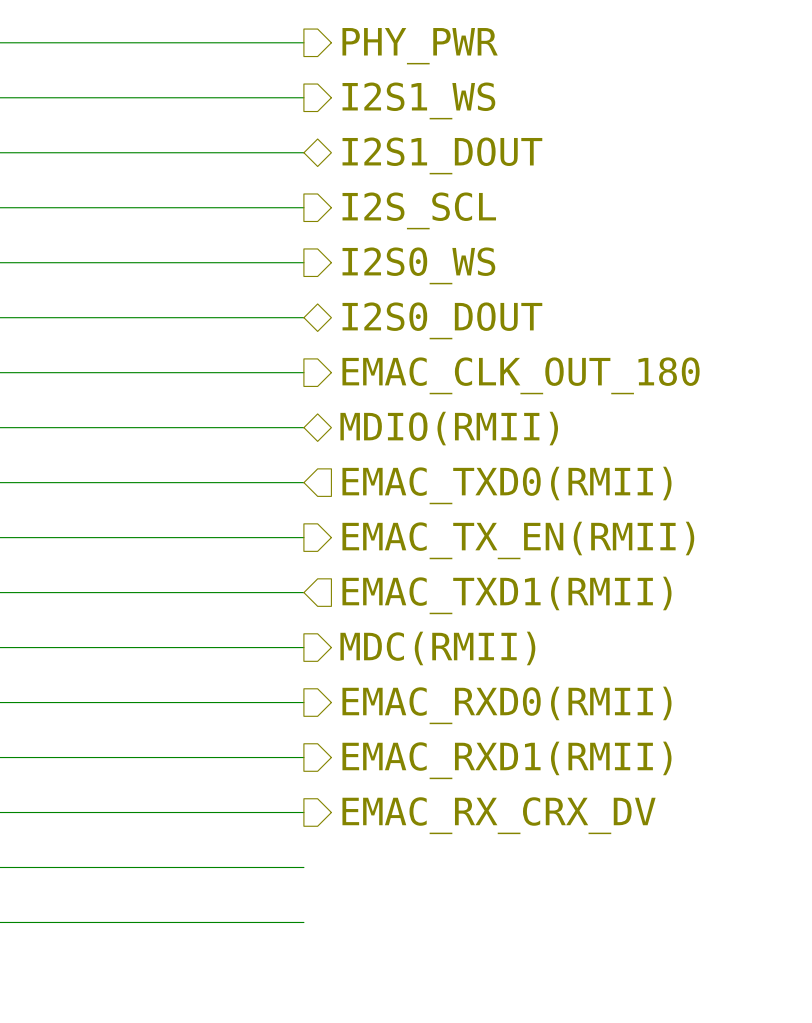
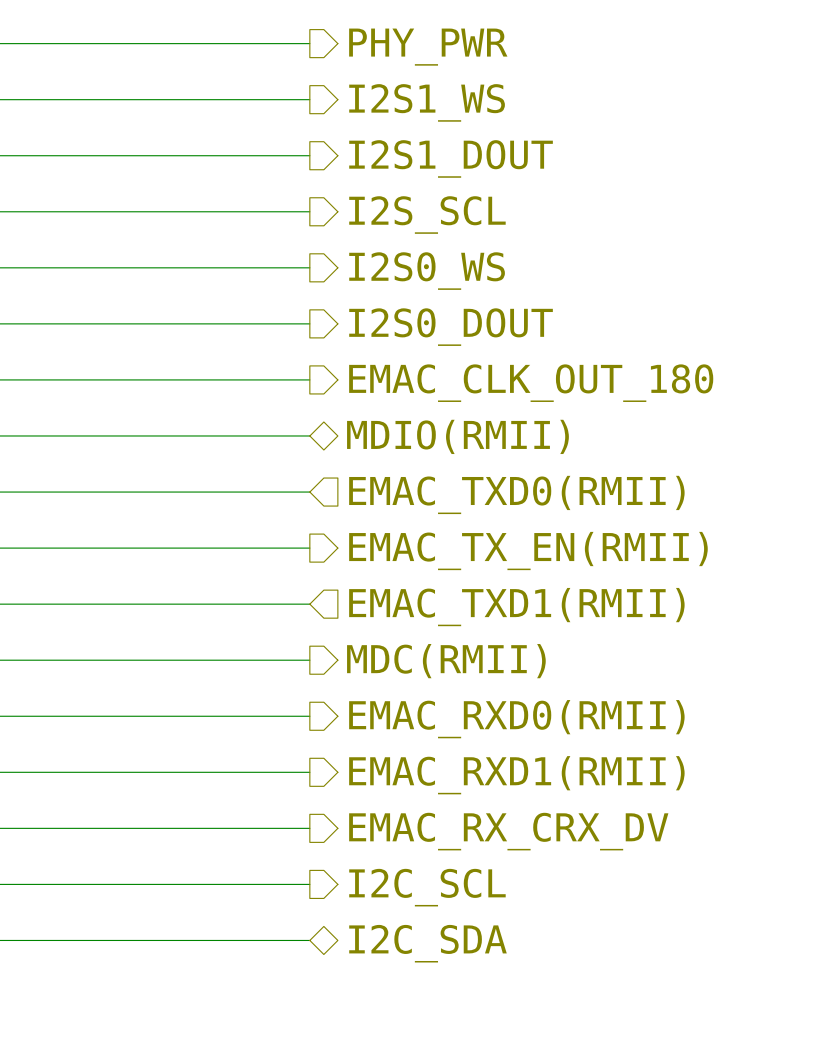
hierarchical label shape: bidirectional (442, 155) -> output (451, 158)
hierarchical label shape: bidirectional (442, 320) -> output (451, 327)
hierarchical label: none -> I2C_SCL (427, 887)
hierarchical label: none -> I2C_SDA (427, 943)

